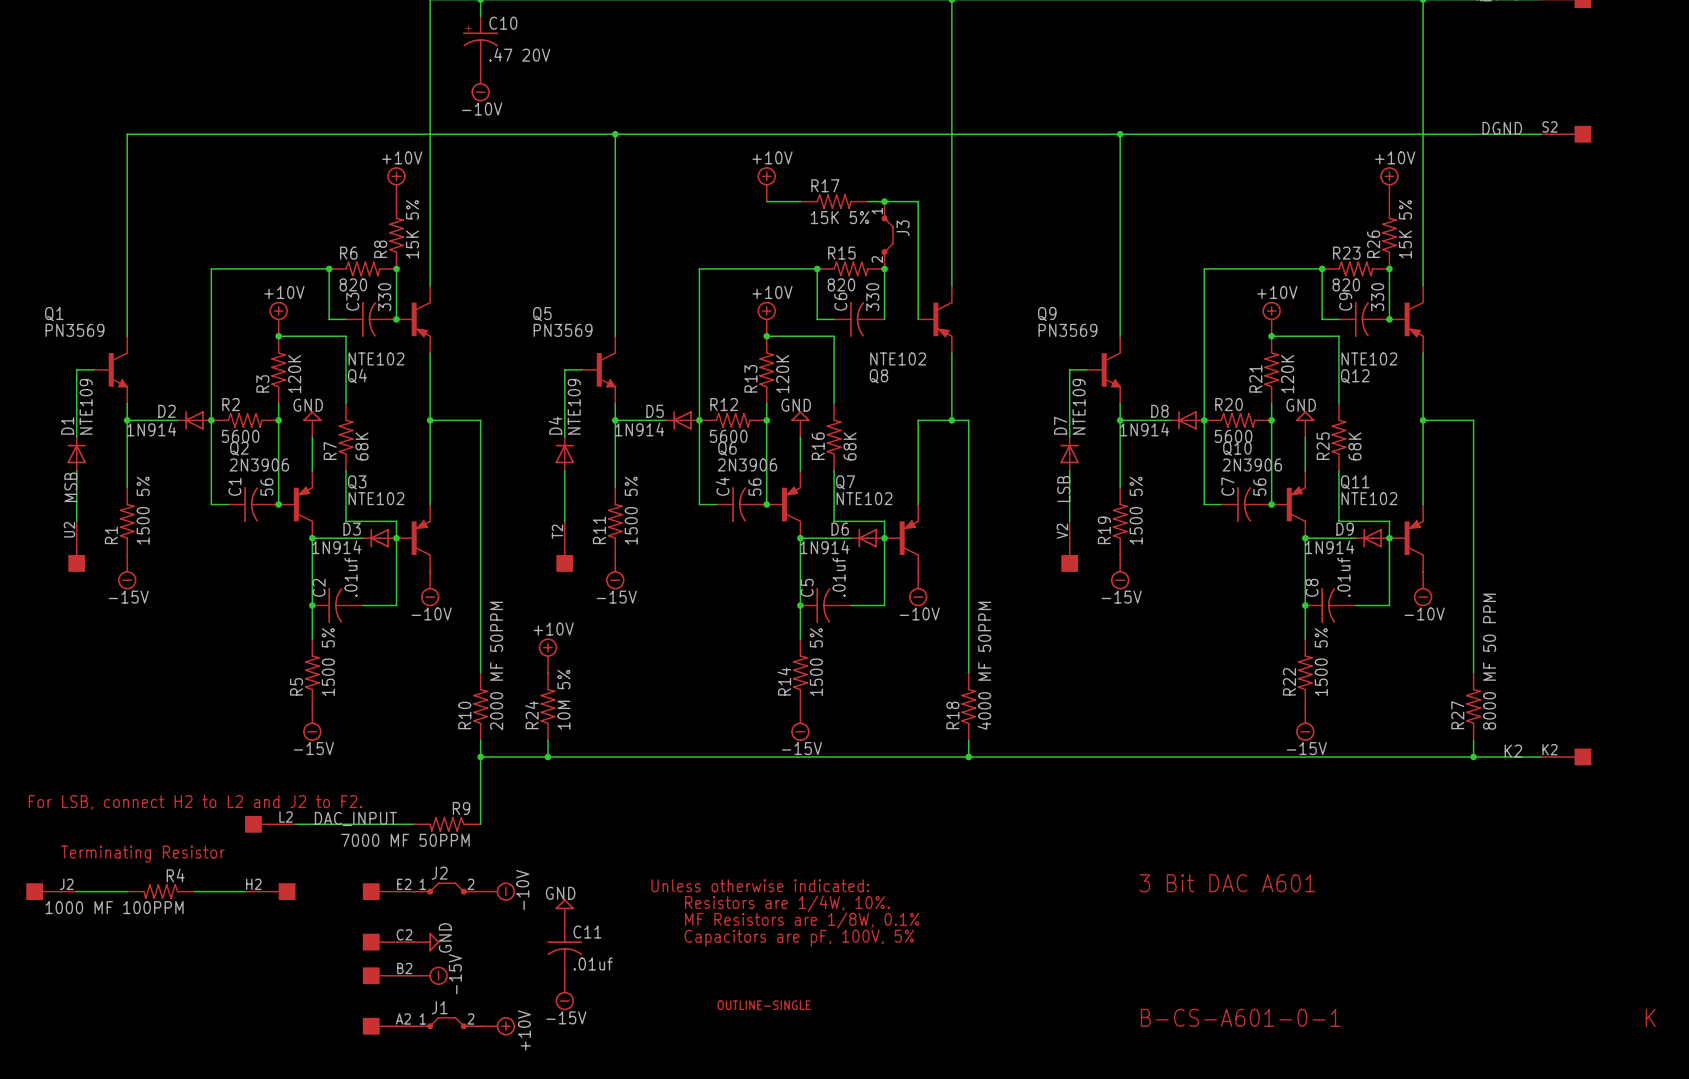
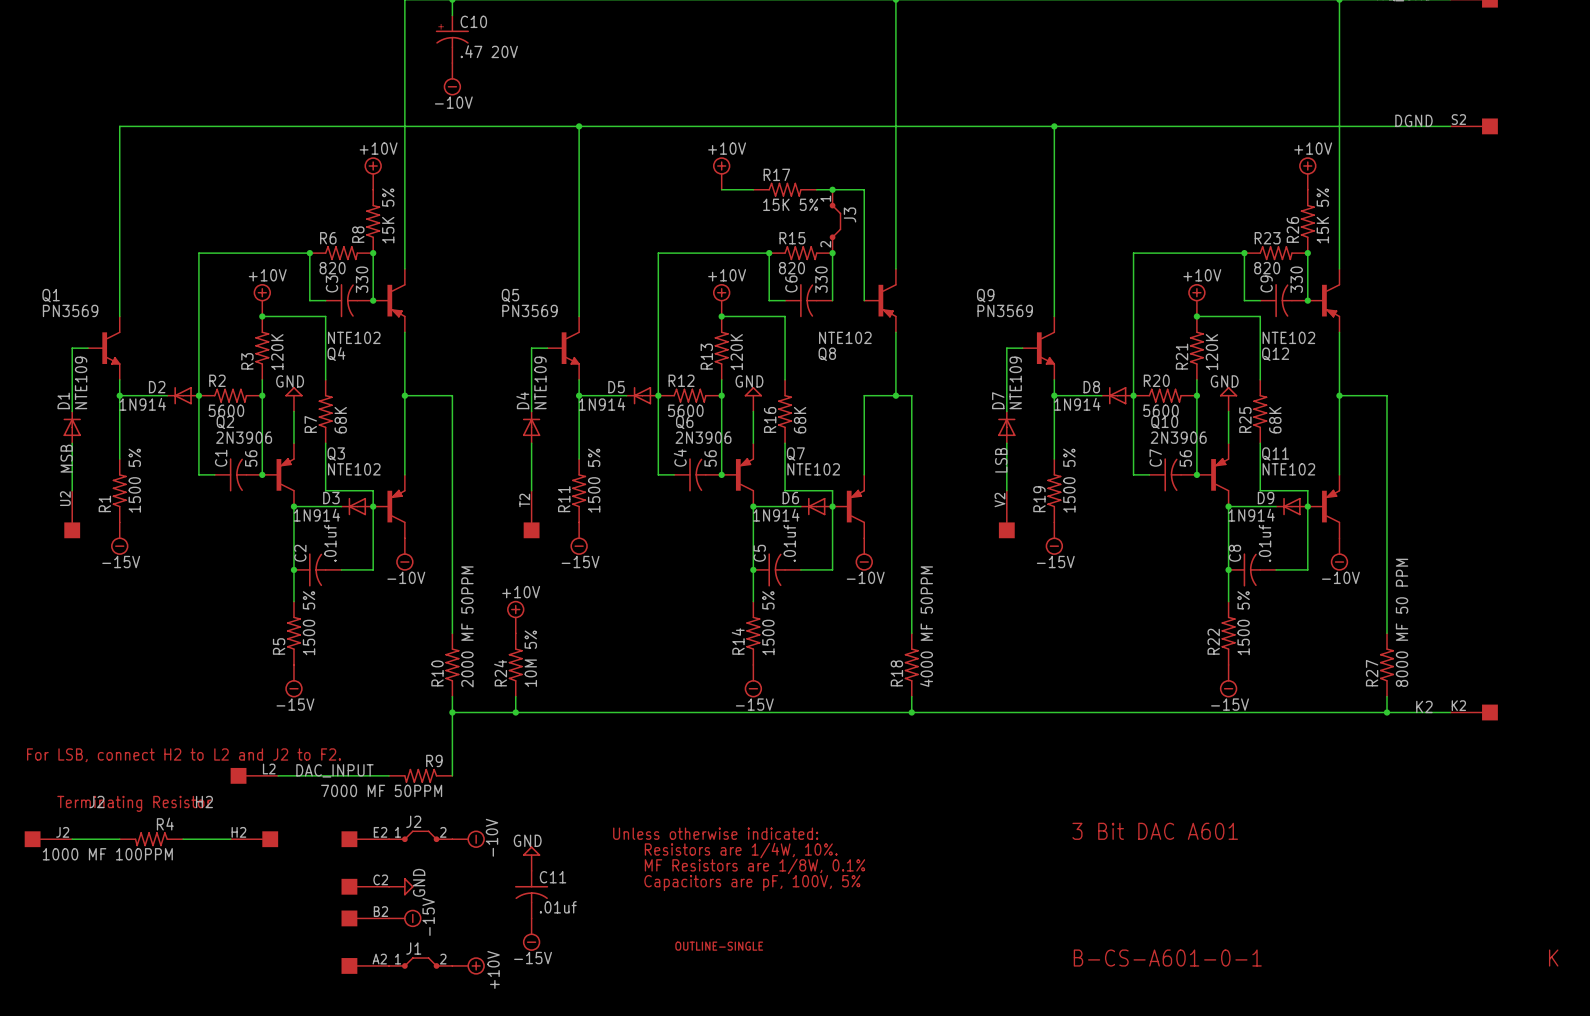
label: none -> J2 (96, 802)
label: none -> H2 (204, 802)

